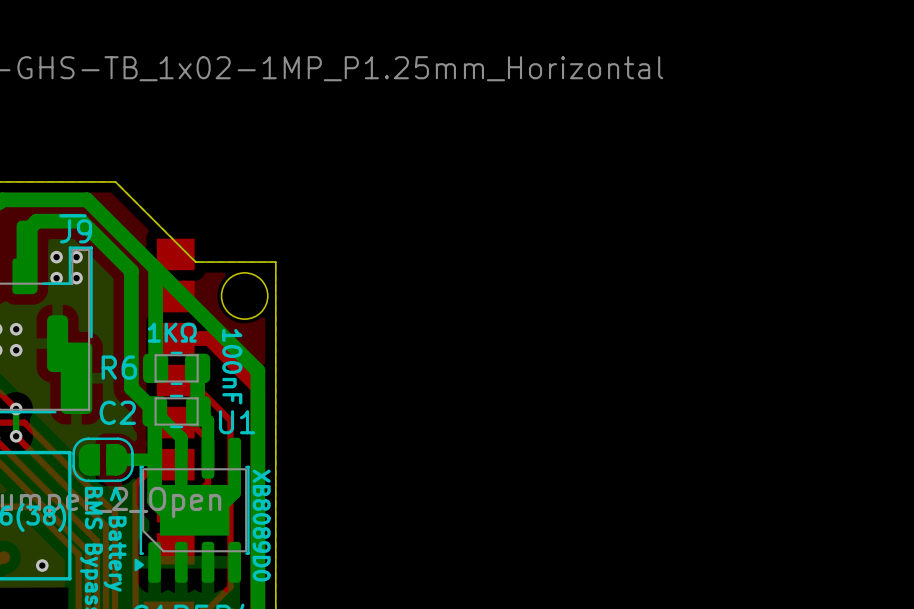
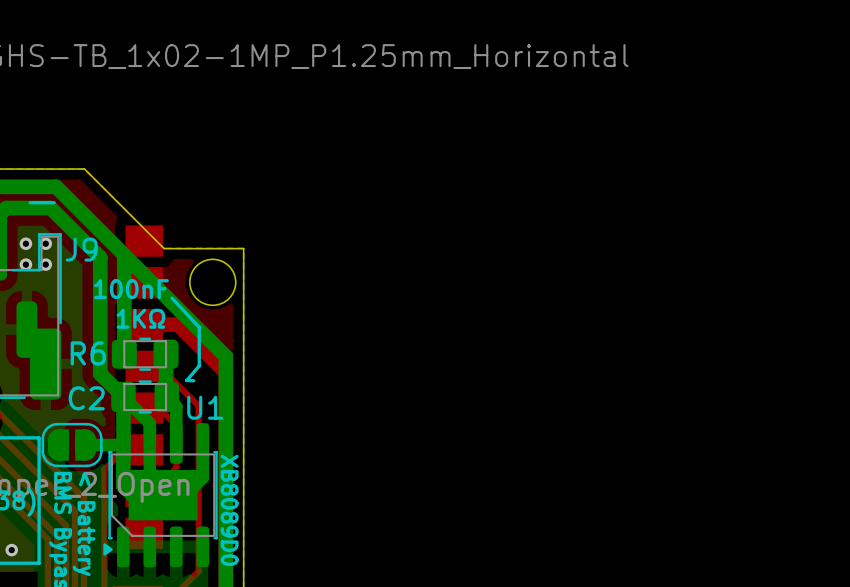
J9 name position: J9 (76, 231) -> J9 (81, 249)
line: none -> (172, 298) (199, 327) (199, 365) (186, 380) (193, 380)
text rotation: 0° (232, 366) -> 90° counterclockwise (131, 289)
text position: 100nF (232, 366) -> 100nF (131, 289)

